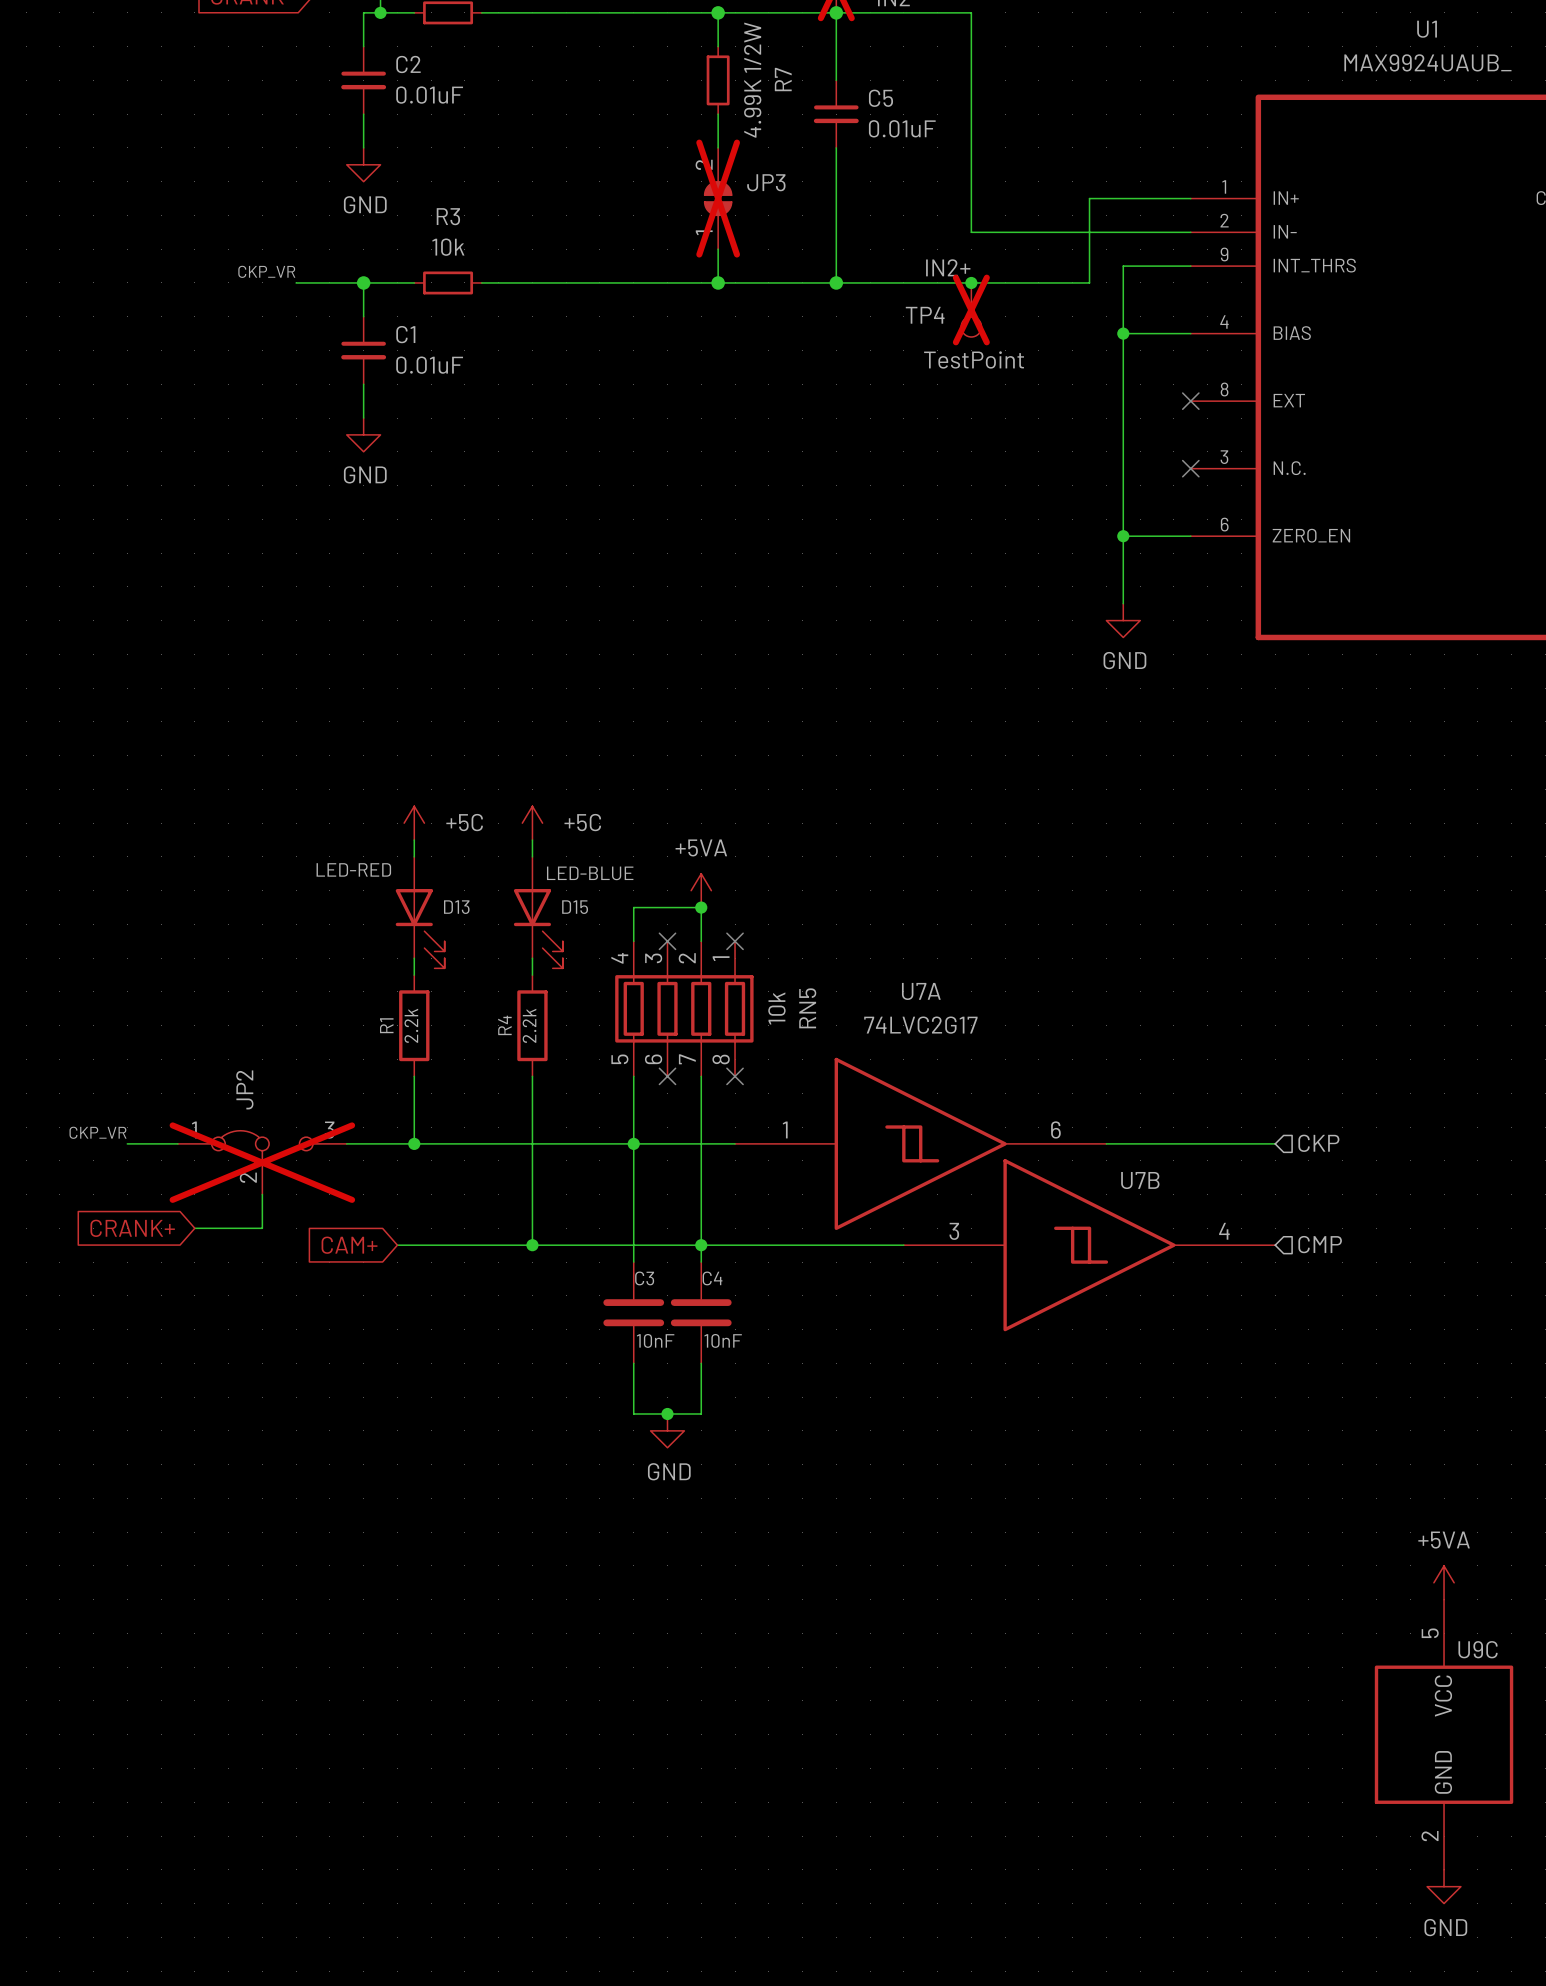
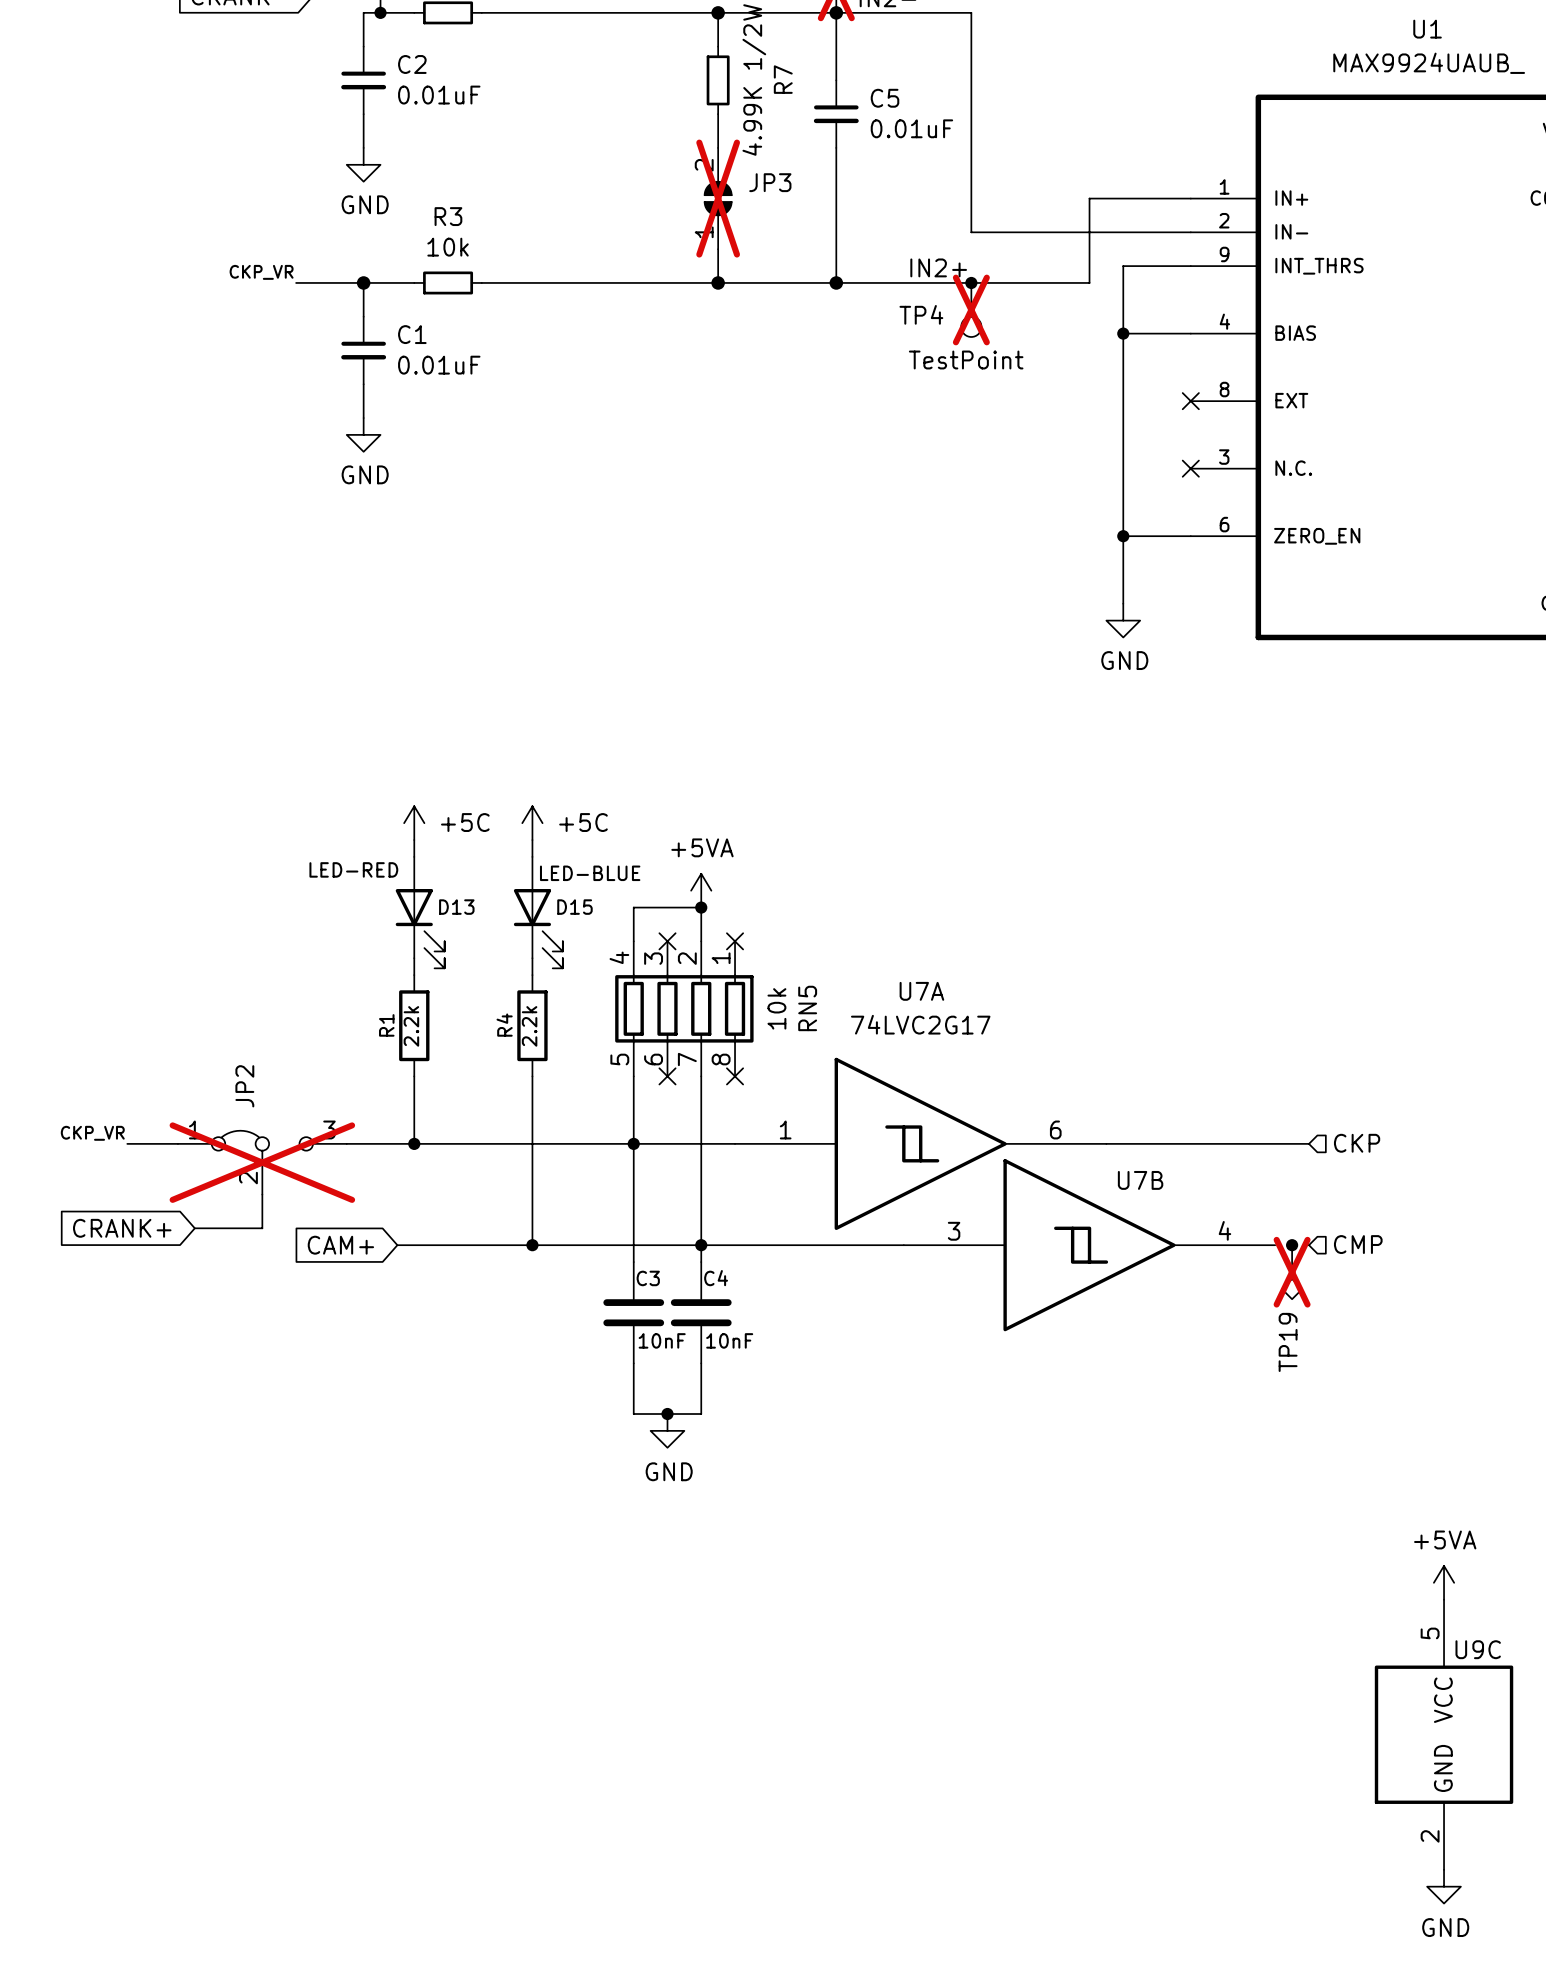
wire: none -> (1275, 1143) (1308, 1143)
hierarchical label position: CKP (1318, 1143) -> CKP (1357, 1143)
hierarchical label position: CMP (1320, 1244) -> CMP (1358, 1244)
junction: none -> (1292, 1245)
TP19: none -> (1292, 1272)

